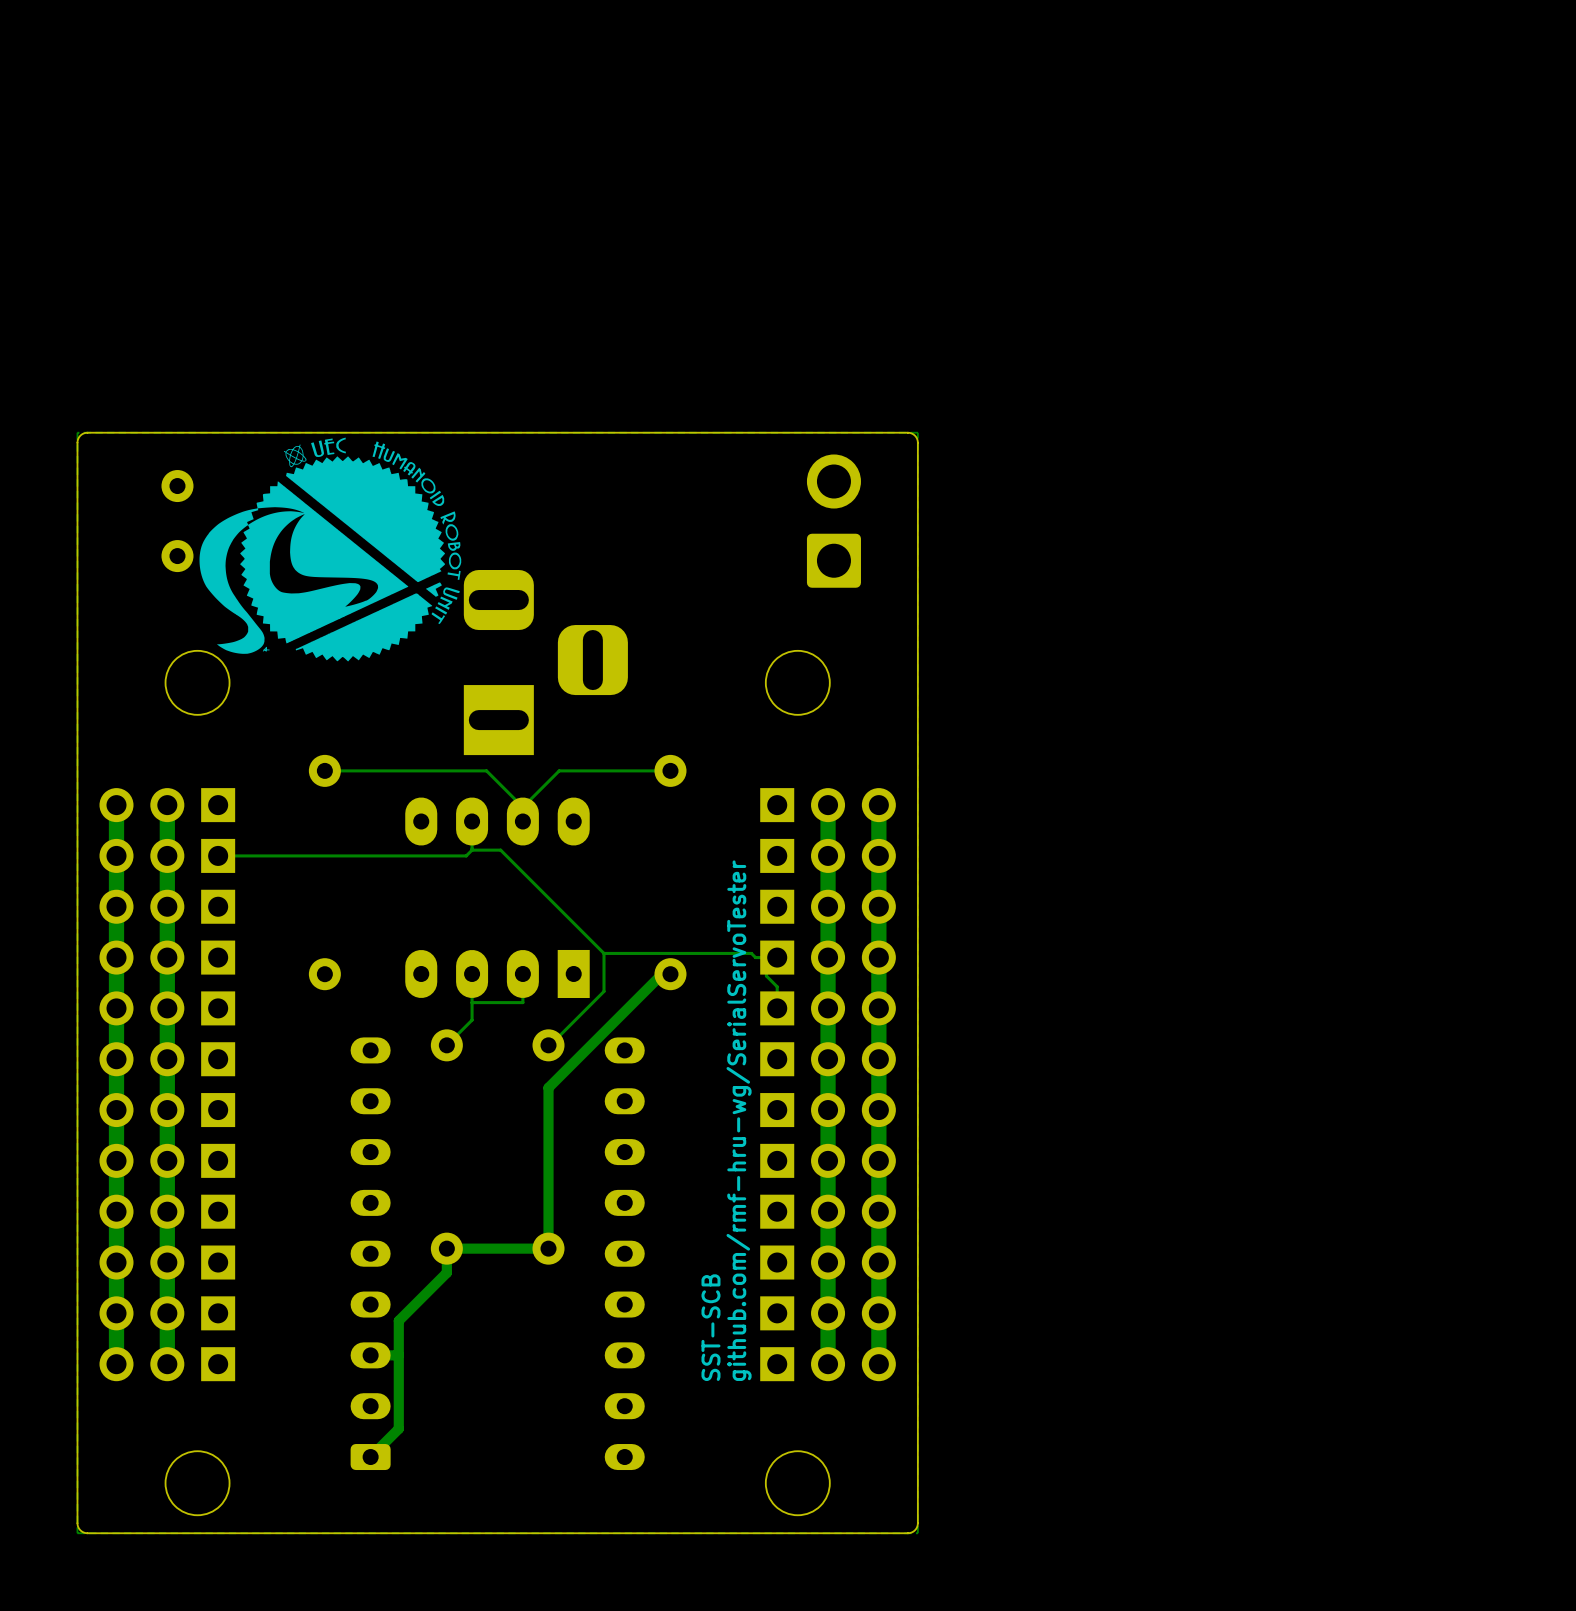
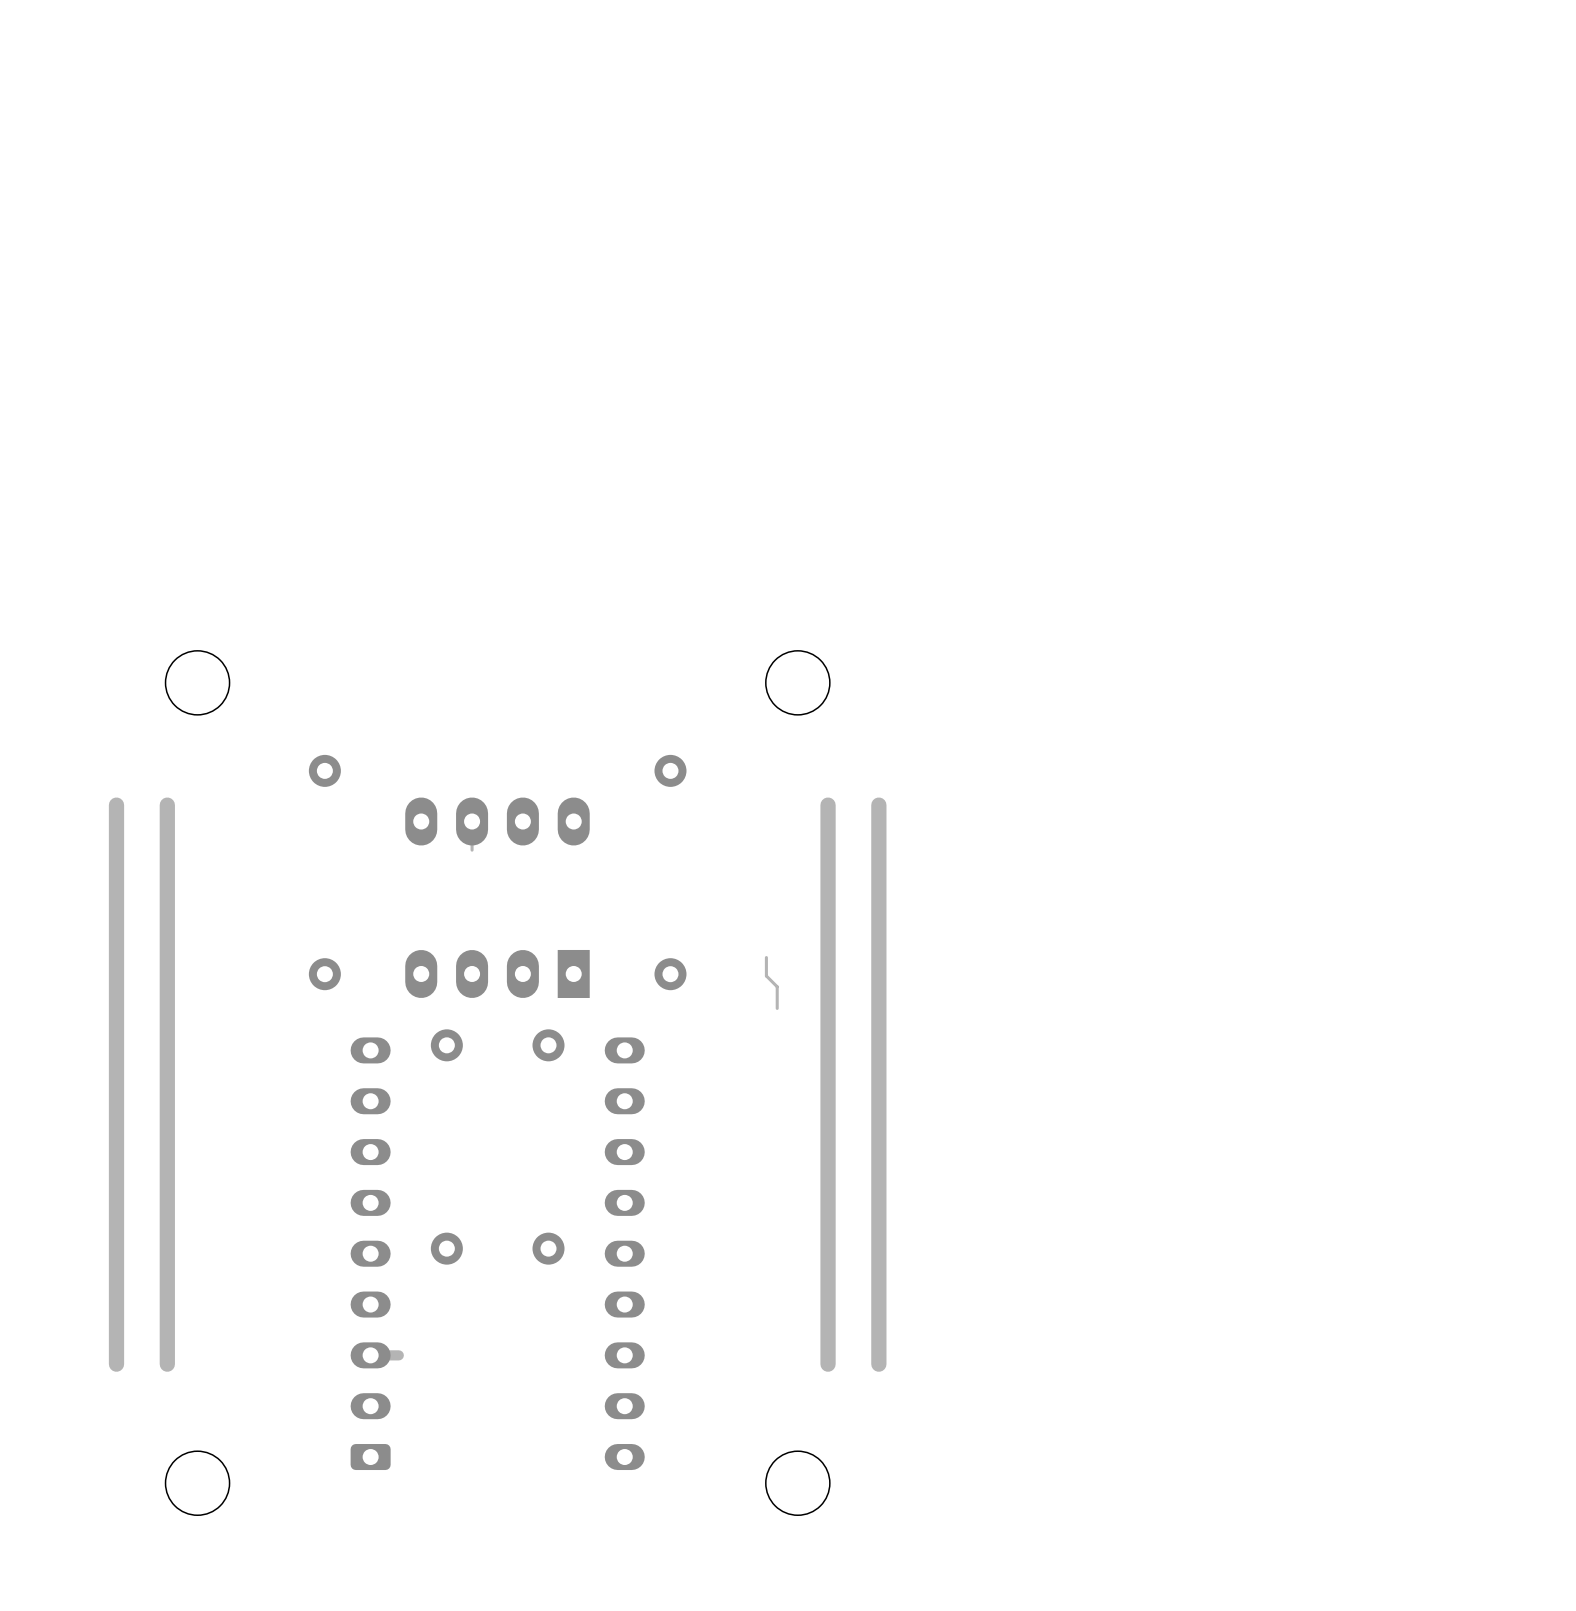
board edge: (907, 432) (87, 432) (79, 436) (77, 442) (77, 1523) (81, 1531) (87, 1533) (907, 1533) (915, 1529) (917, 1523) (917, 442) (914, 435) (907, 432) -> none
drawing: [199, 437, 462, 662] -> none
part: (177, 521) -> none
part: (833, 521) -> none
part: (545, 662) -> none
track: (324, 770) (486, 770) (522, 807) -> none
track: (670, 770) (559, 770) (522, 807) -> none
part: (167, 805) -> none
part: (828, 805) -> none
part: (167, 855) -> none
track: (218, 855) (466, 855) (472, 850) (500, 850) (604, 953) -> none
part: (828, 855) -> none
part: (167, 906) -> none
part: (828, 906) -> none
track: (604, 953) (751, 953) (755, 957) (777, 957) -> none
track: (604, 953) (604, 991) (548, 1045) -> none
part: (167, 957) -> none
part: (828, 957) -> none
track: (472, 973) (472, 1020) (446, 1045) -> none
track: (522, 973) (522, 1002) (472, 1002) -> none
track: (670, 974) (662, 974) (548, 1087) (548, 1248) (446, 1248) (446, 1272) (398, 1320) (398, 1428) (370, 1457) -> none
part: (167, 1008) -> none
part: (828, 1008) -> none
part: (167, 1059) -> none
part: (828, 1059) -> none
part: (167, 1110) -> none
part: (828, 1110) -> none
text: github.com/rmf-hru-wg/SerialServoTester (739, 1120) -> none
part: (167, 1160) -> none
part: (828, 1160) -> none
part: (167, 1211) -> none
part: (828, 1211) -> none
part: (167, 1262) -> none
part: (828, 1262) -> none
part: (167, 1313) -> none
part: (828, 1313) -> none
text: SST-SCB (710, 1327) -> none
part: (167, 1364) -> none
part: (828, 1364) -> none

